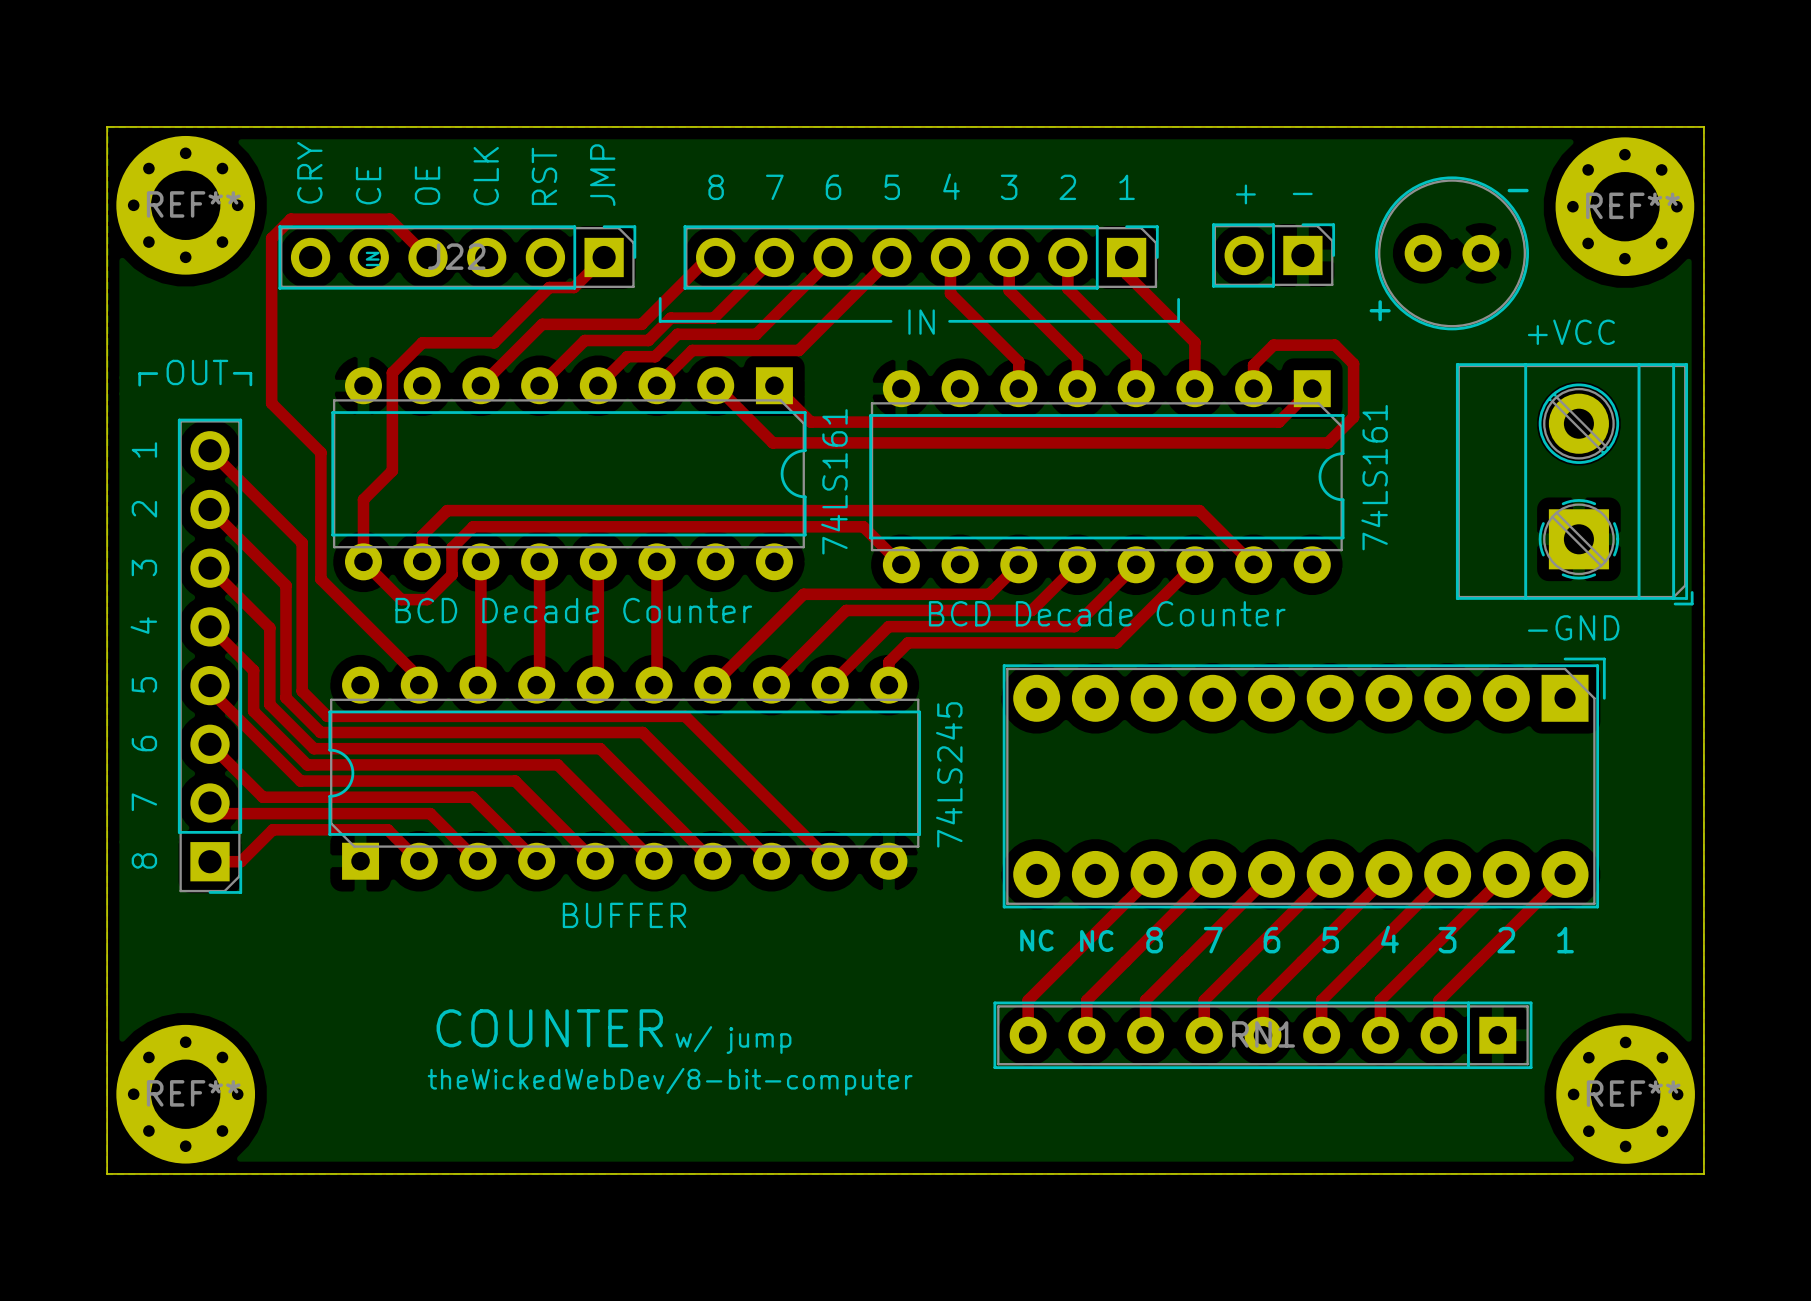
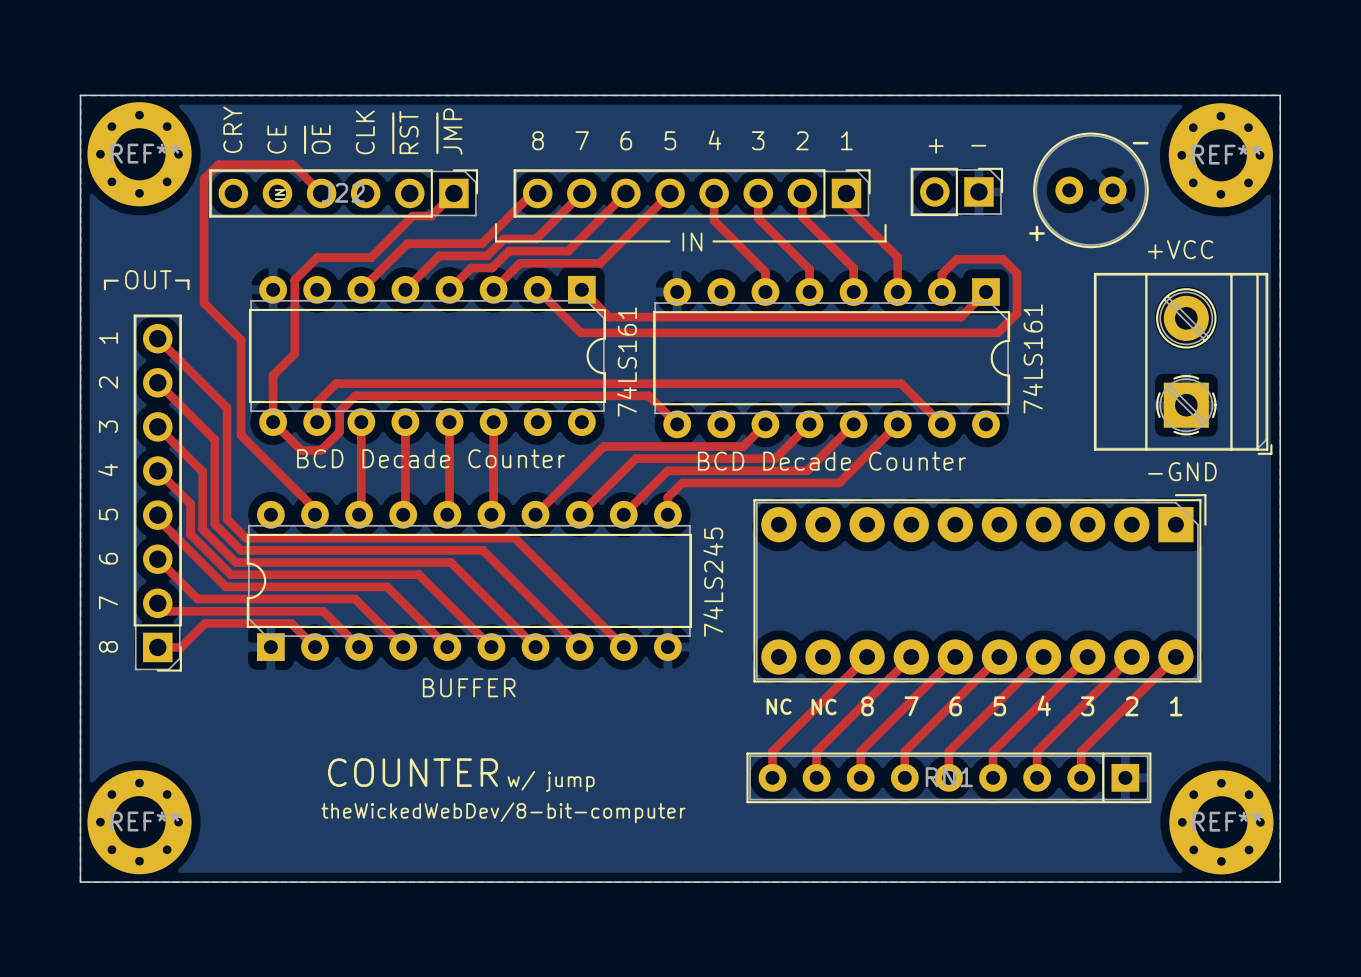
line: none -> (393, 113) (393, 153)
line: none -> (437, 113) (437, 153)
line: none -> (305, 126) (305, 153)

